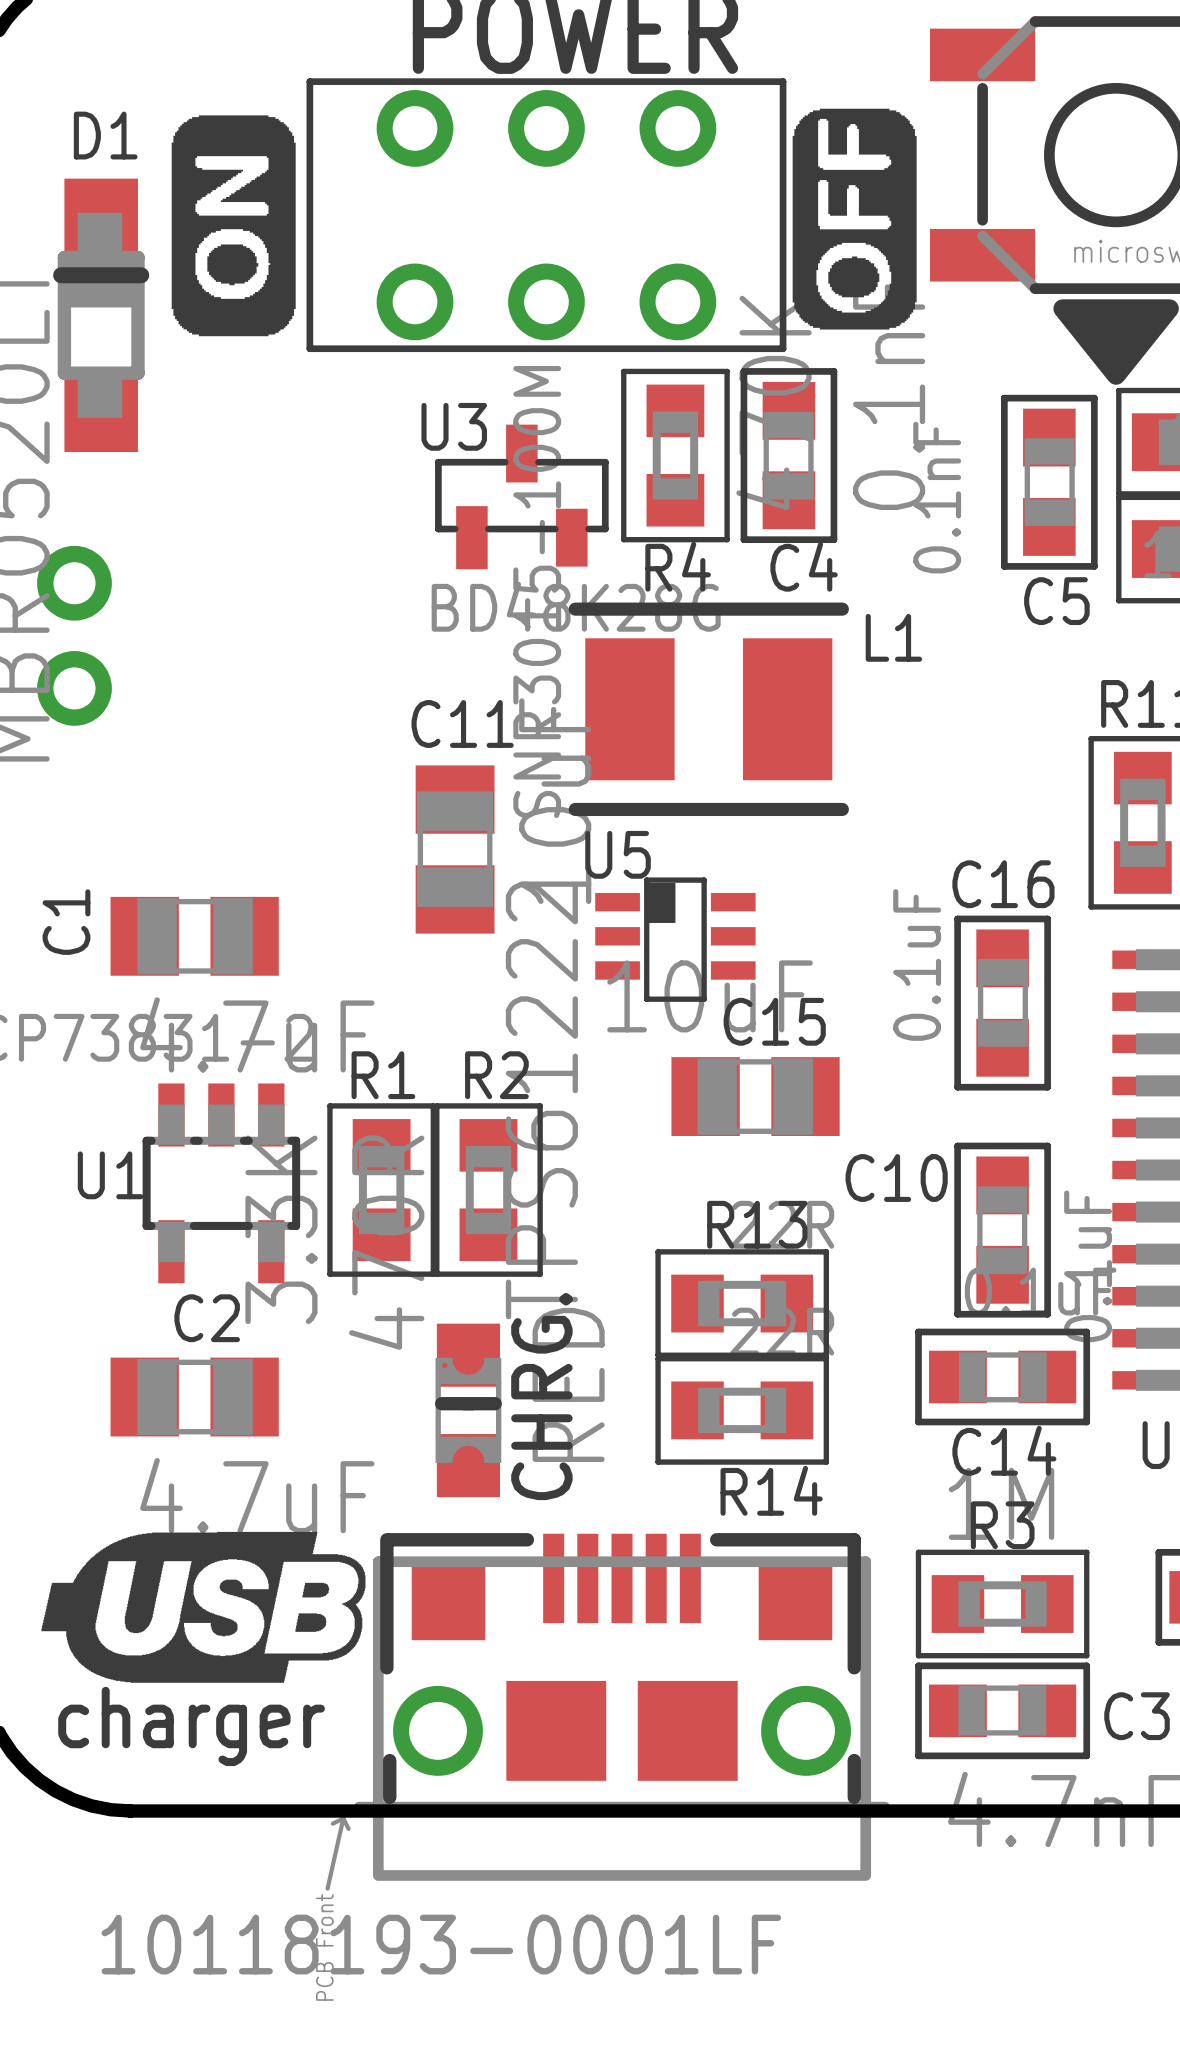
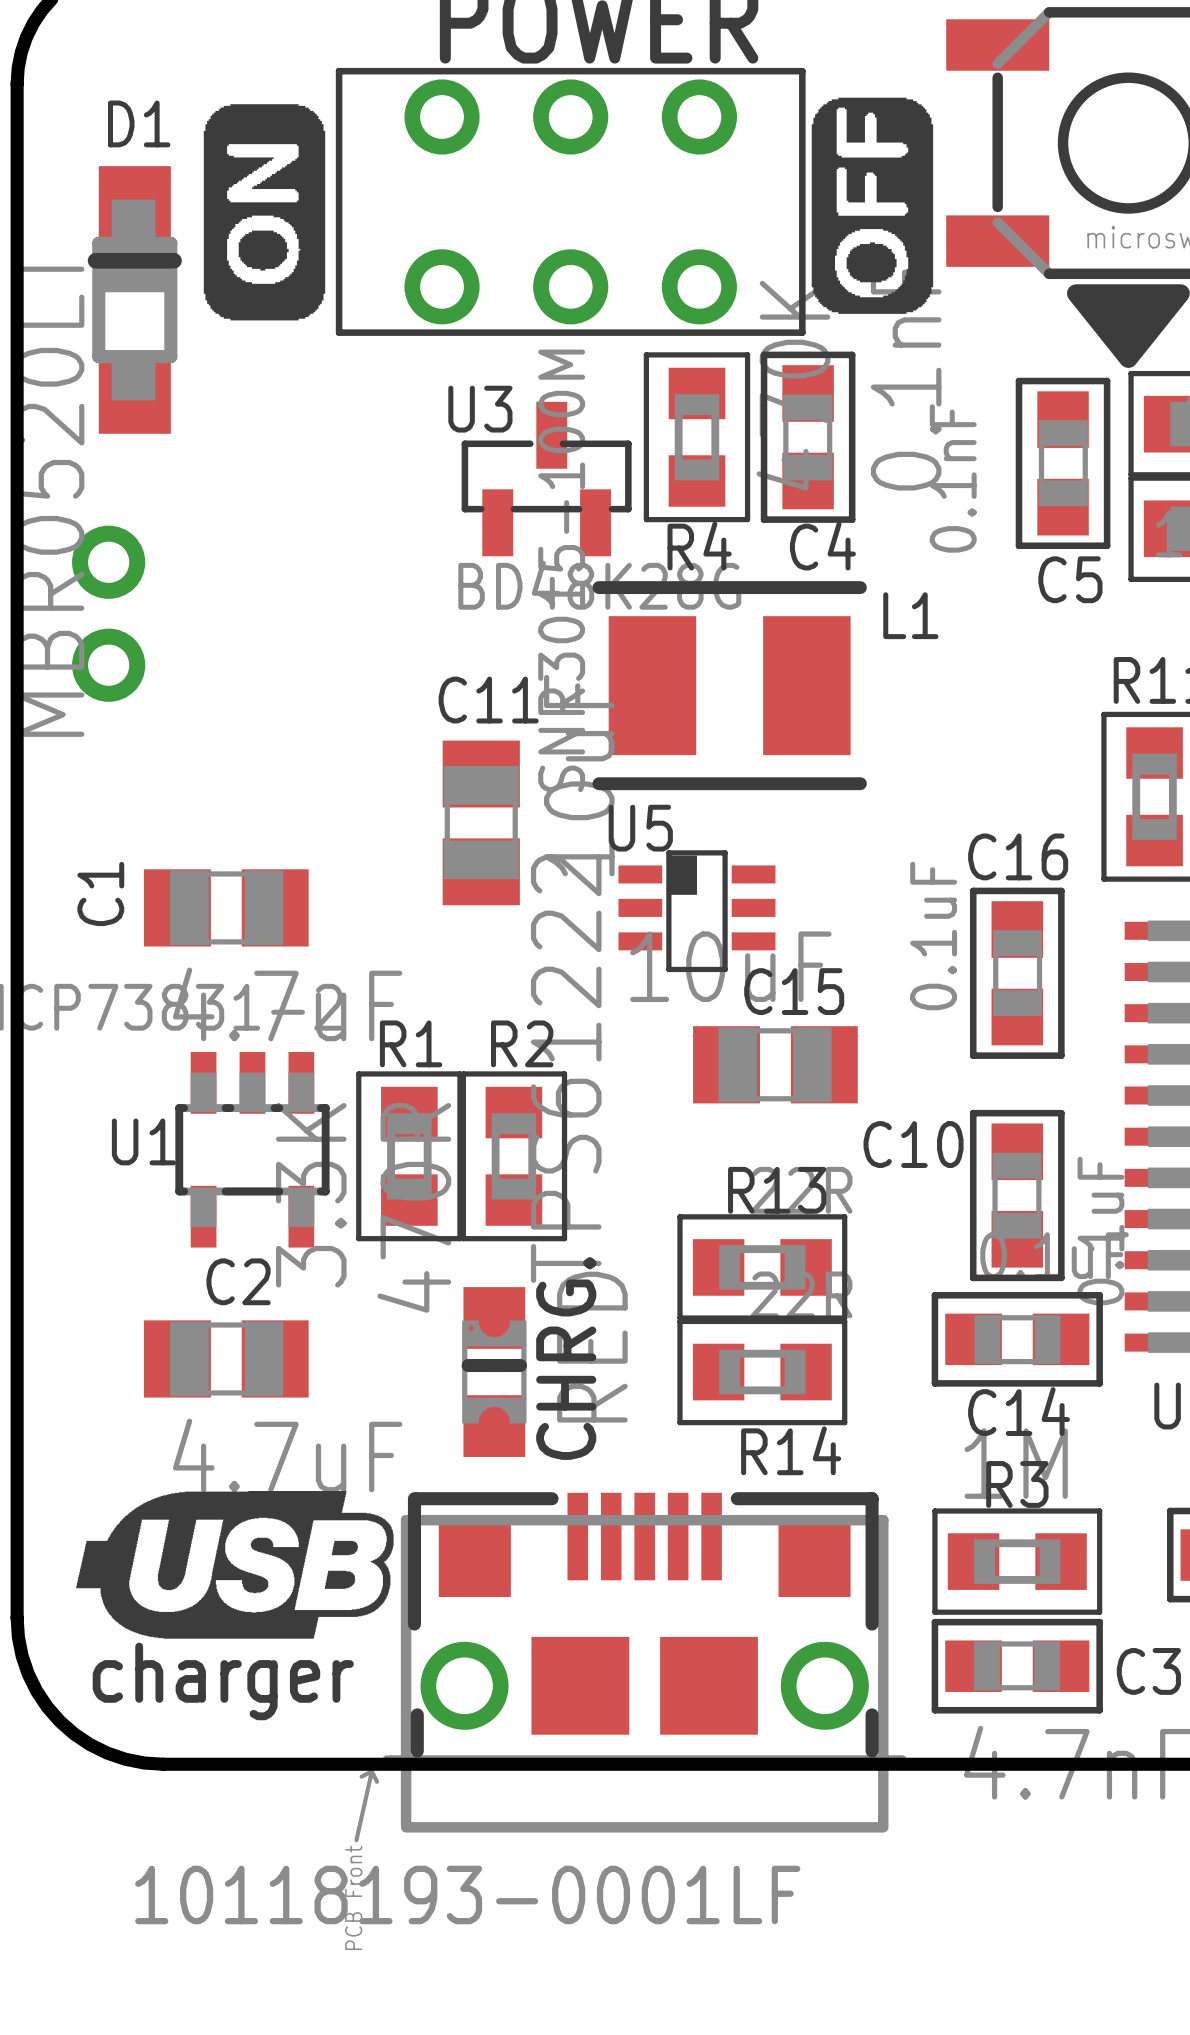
U3 footprint: [435, 424, 609, 570] -> [461, 401, 632, 557]

